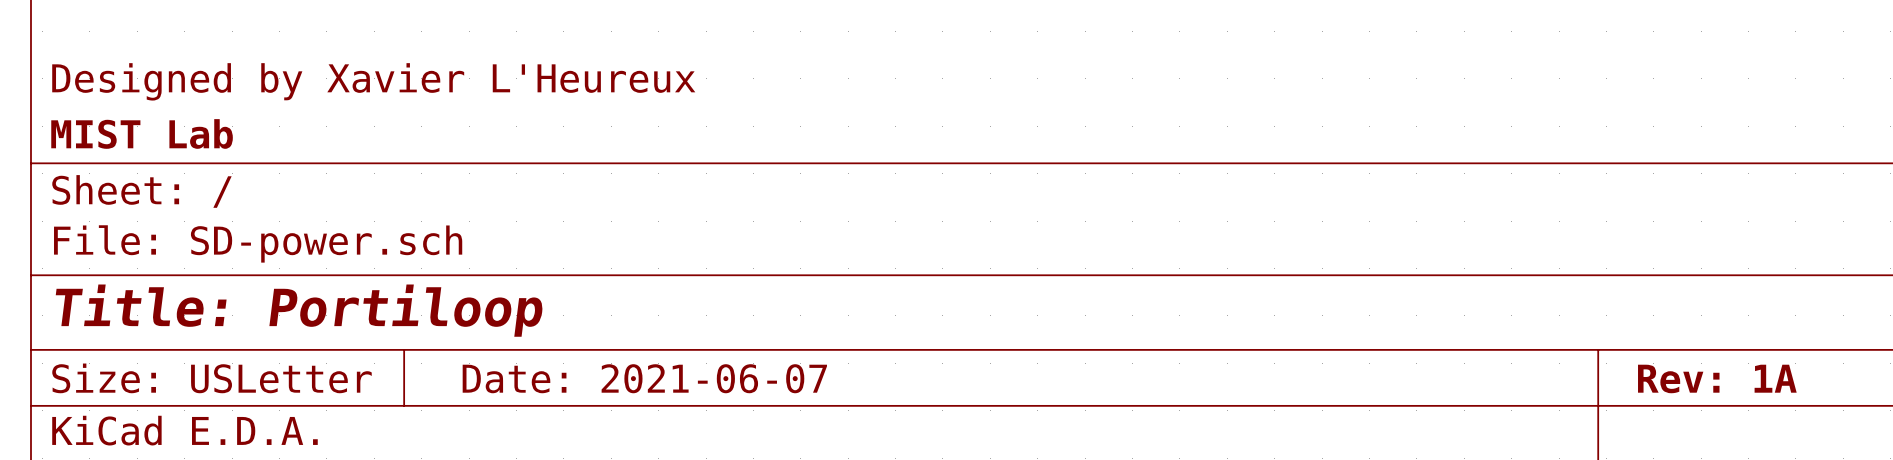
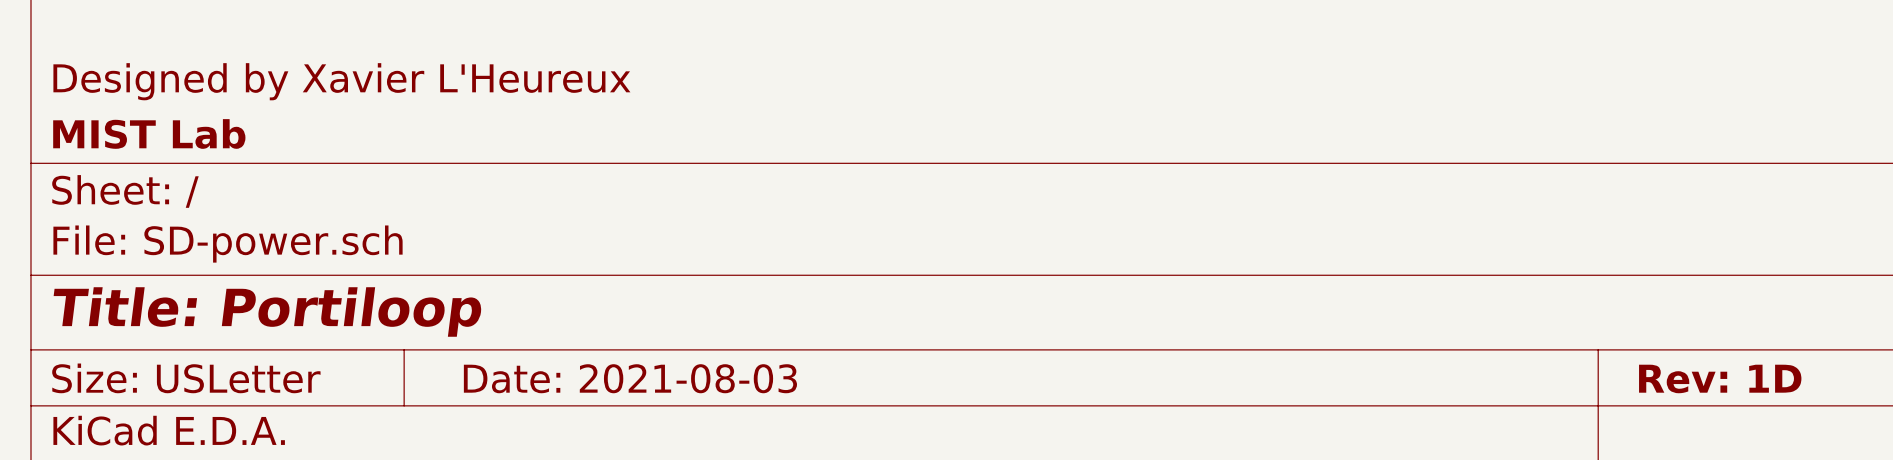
title block: Date: 2021-06-07 (644, 378) -> Date: 2021-08-03 (630, 378)
title block: Rev: 1A (1717, 378) -> Rev: 1D (1720, 378)

